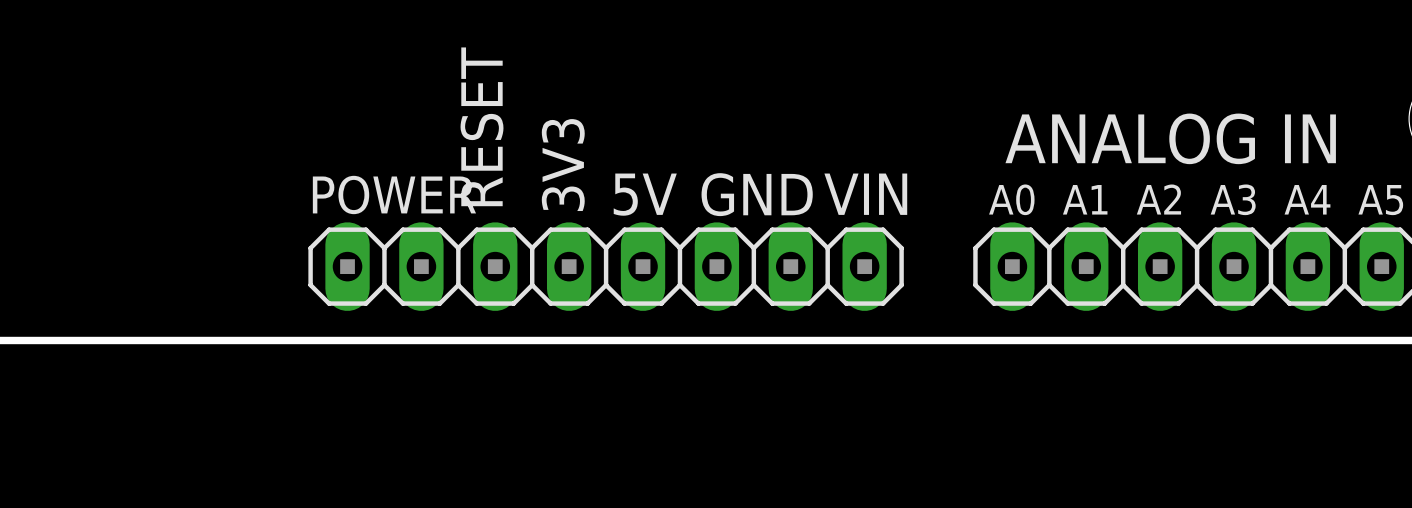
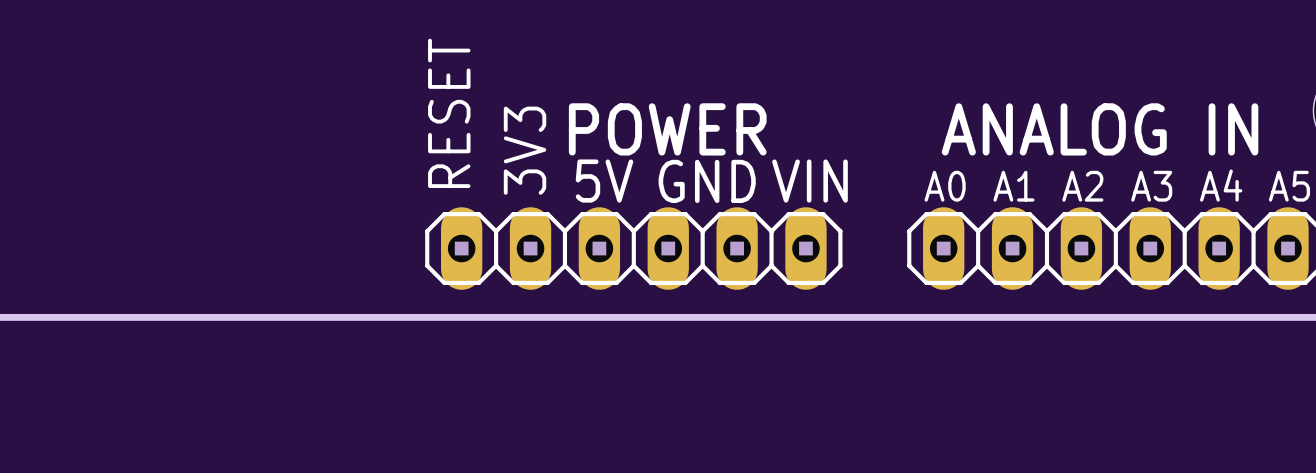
POWER: (606, 266) -> none
POWER: none -> (633, 248)

